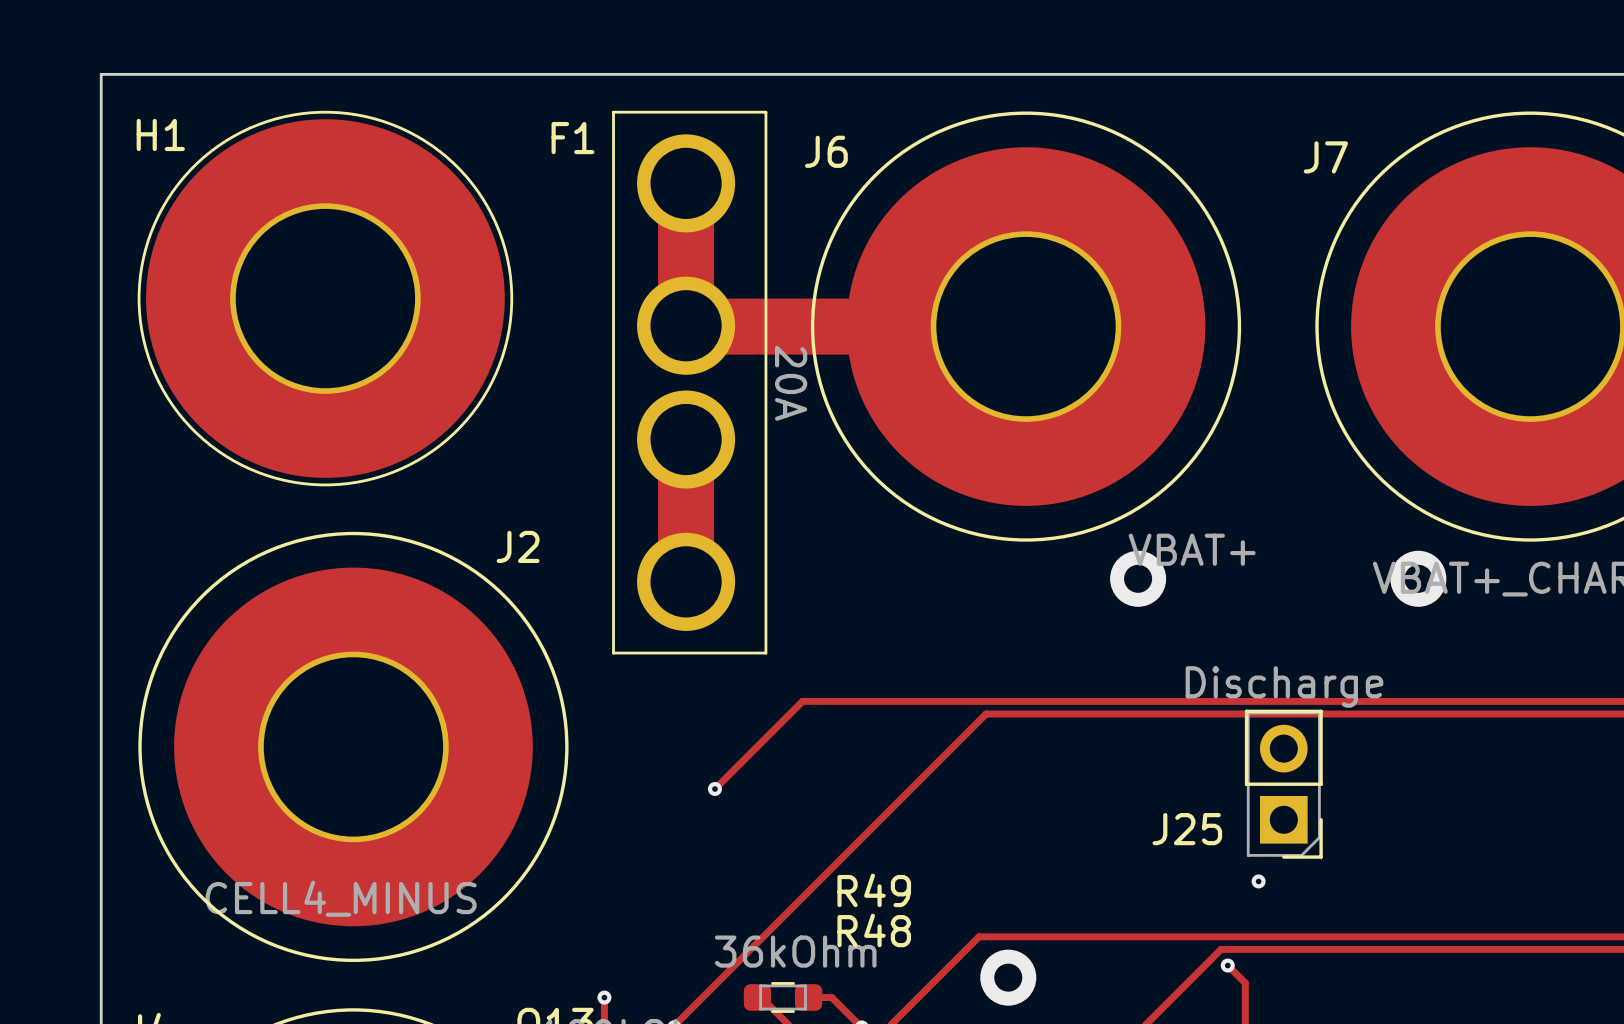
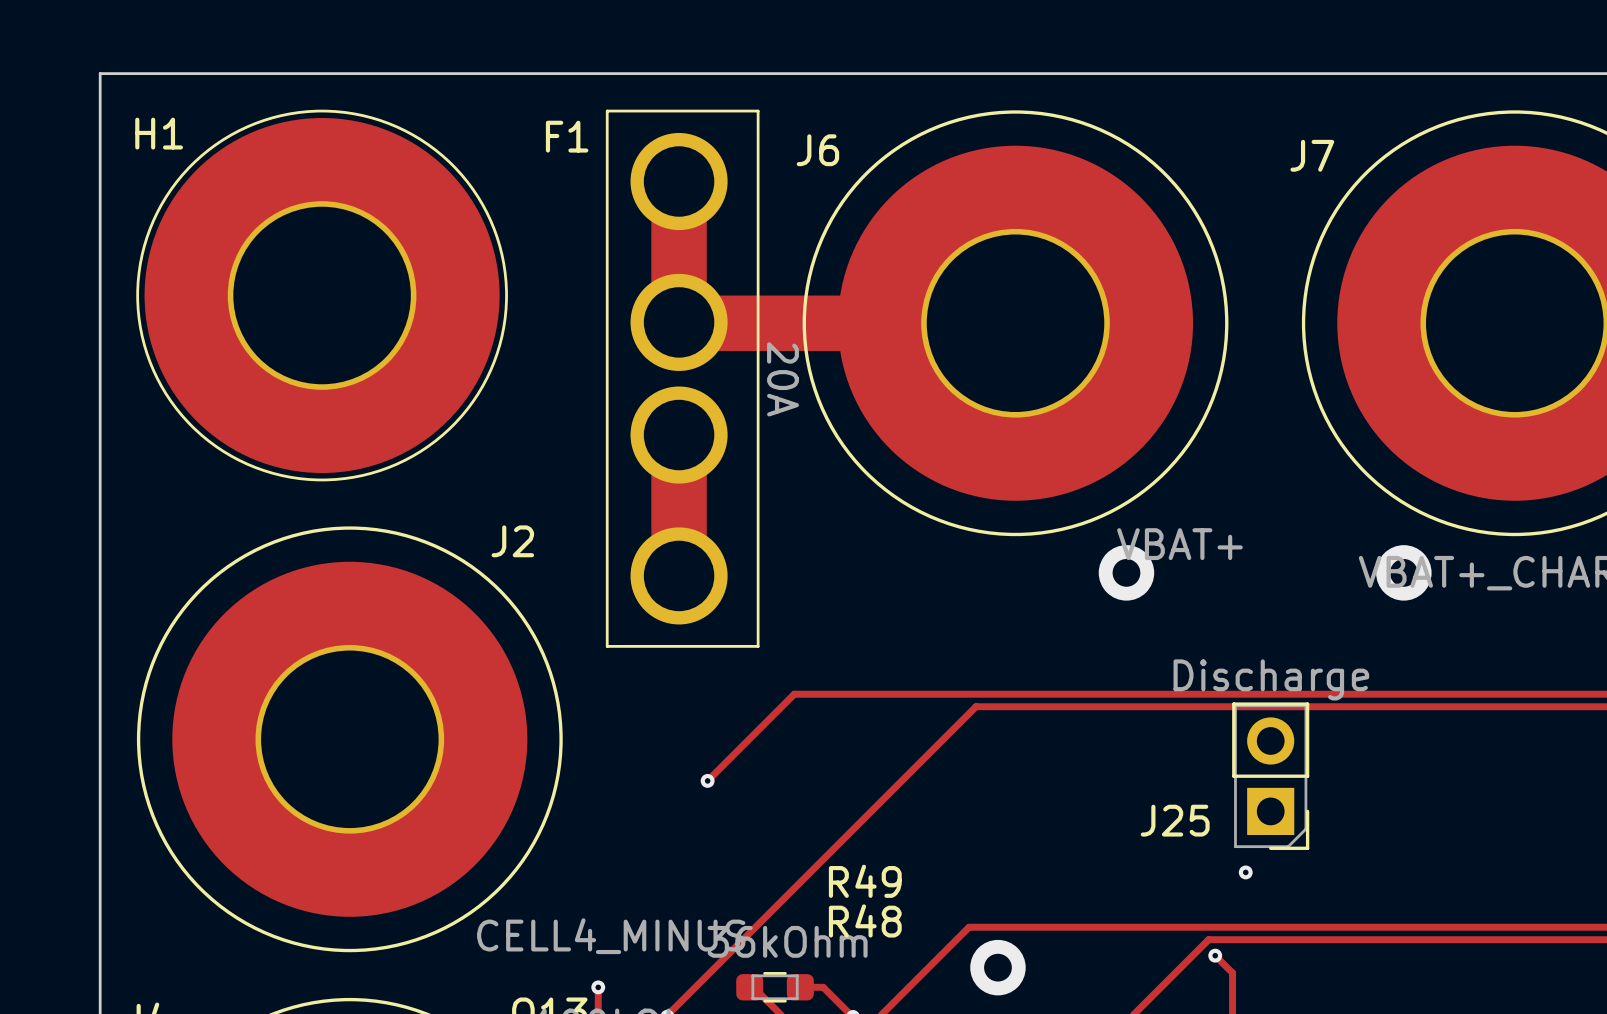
J2 value position: CELL4_MINUS (341, 898) -> CELL4_MINUS (611, 936)

